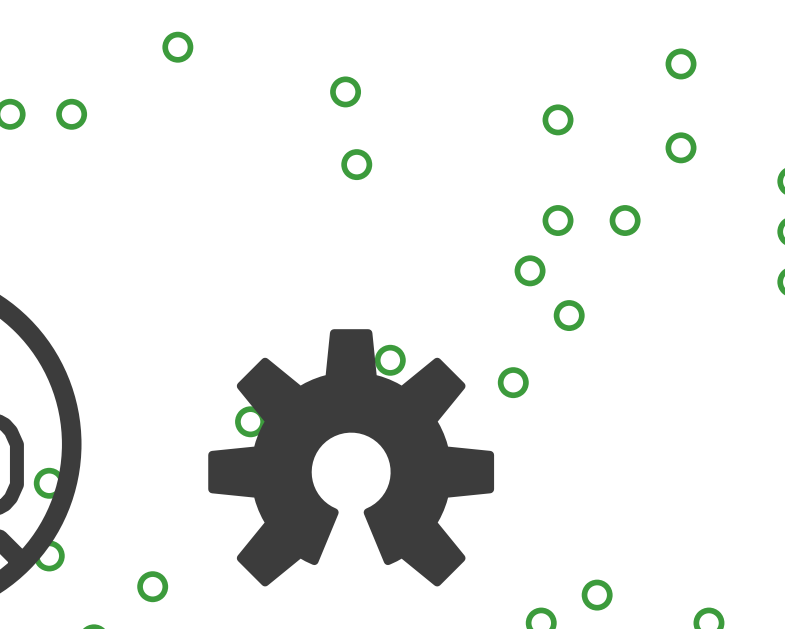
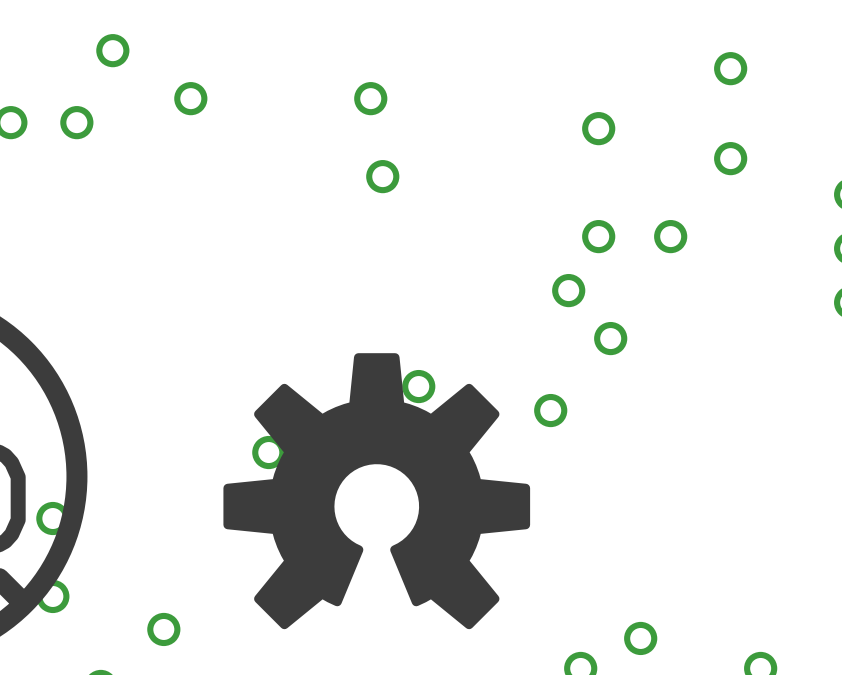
via: none -> (112, 50)
via: (177, 47) -> none
via: none -> (190, 98)

